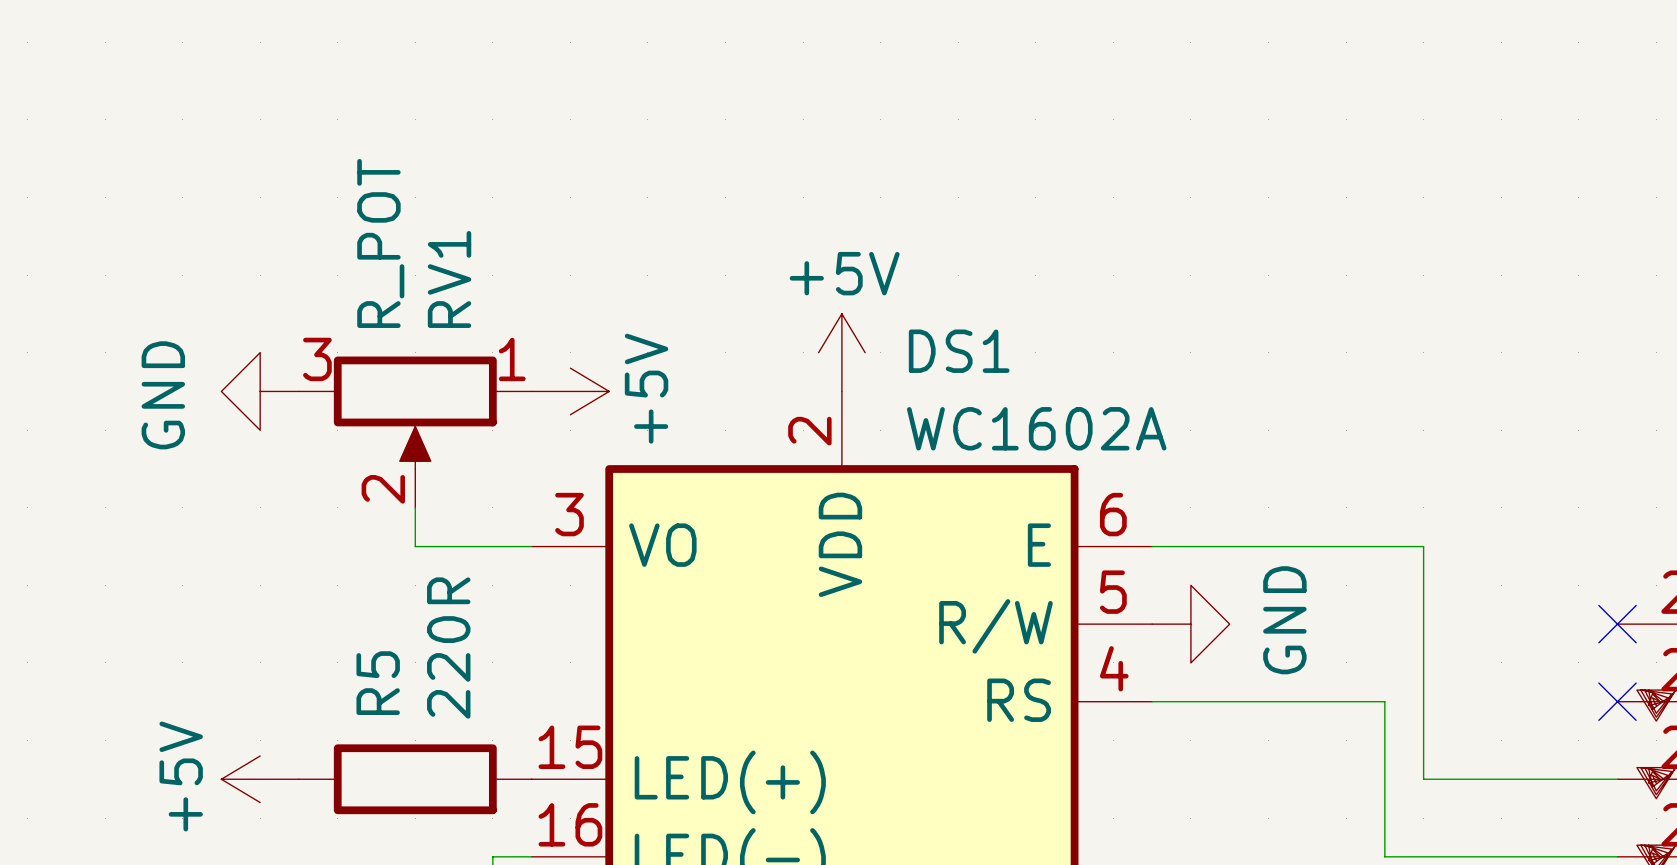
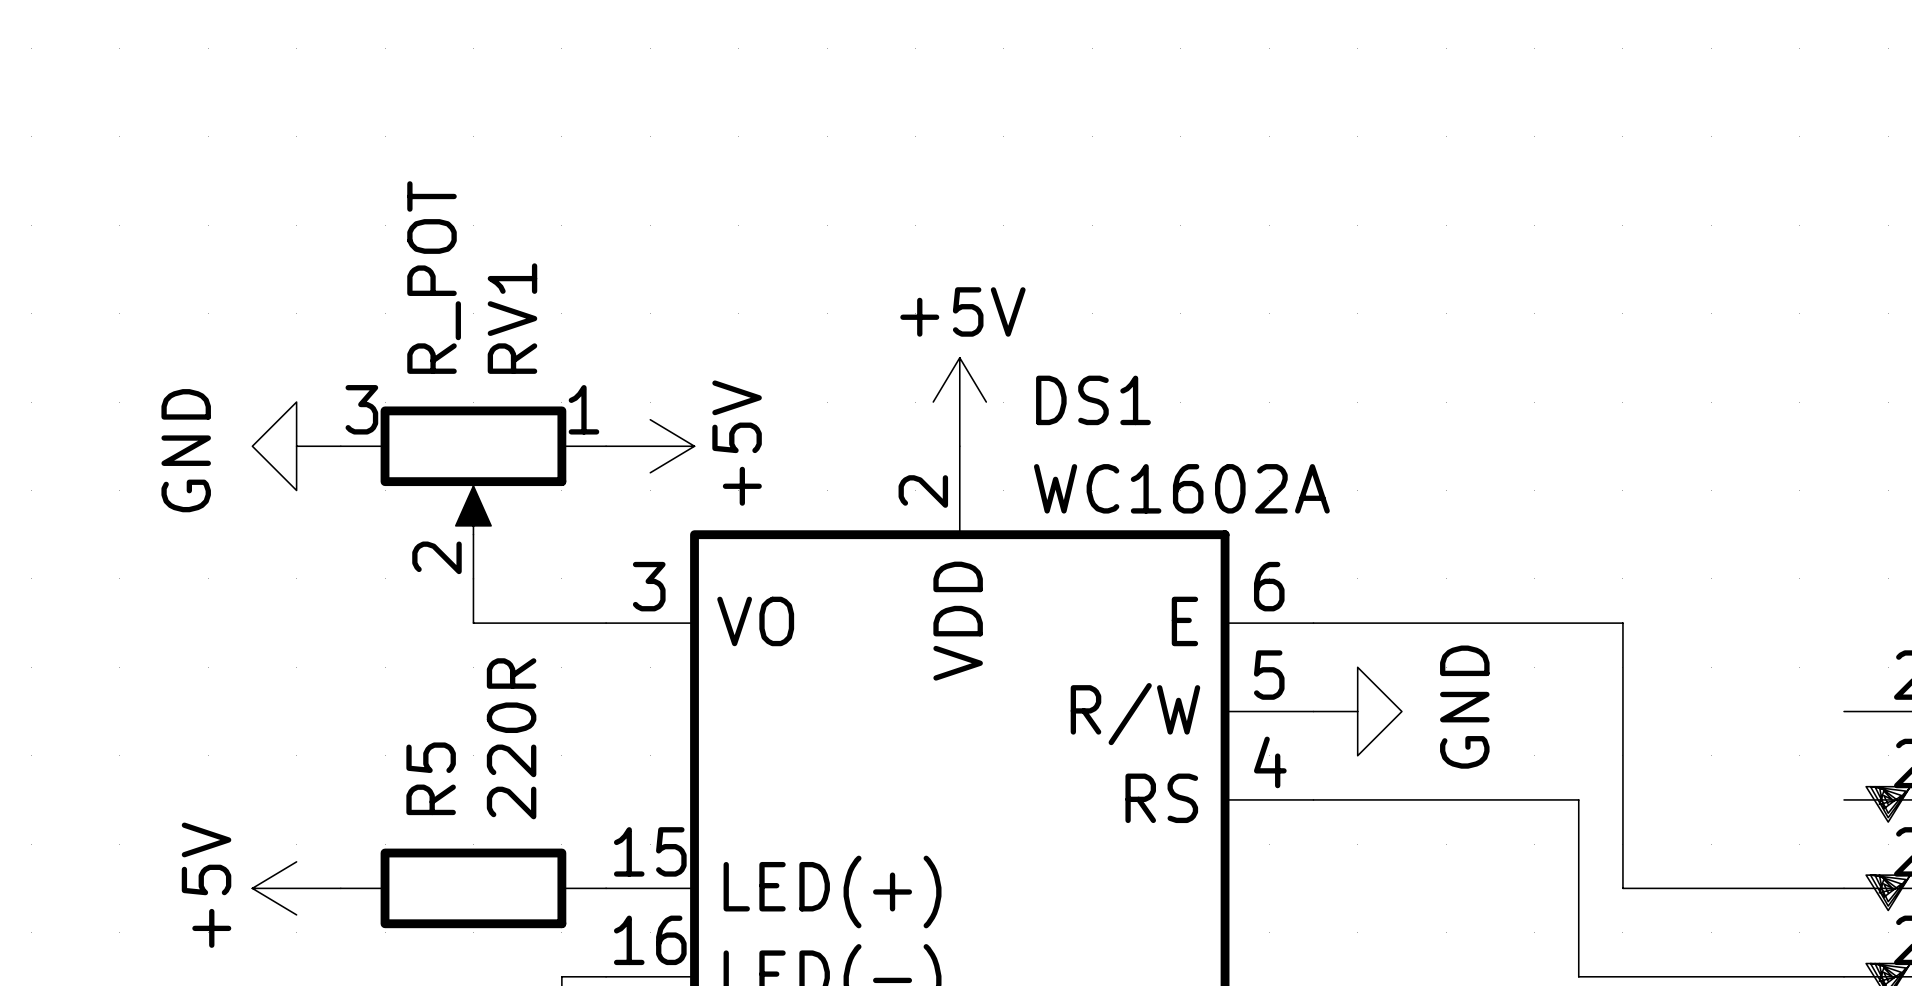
no-connect mark: (1617, 624) -> none
no-connect mark: (1617, 701) -> none

